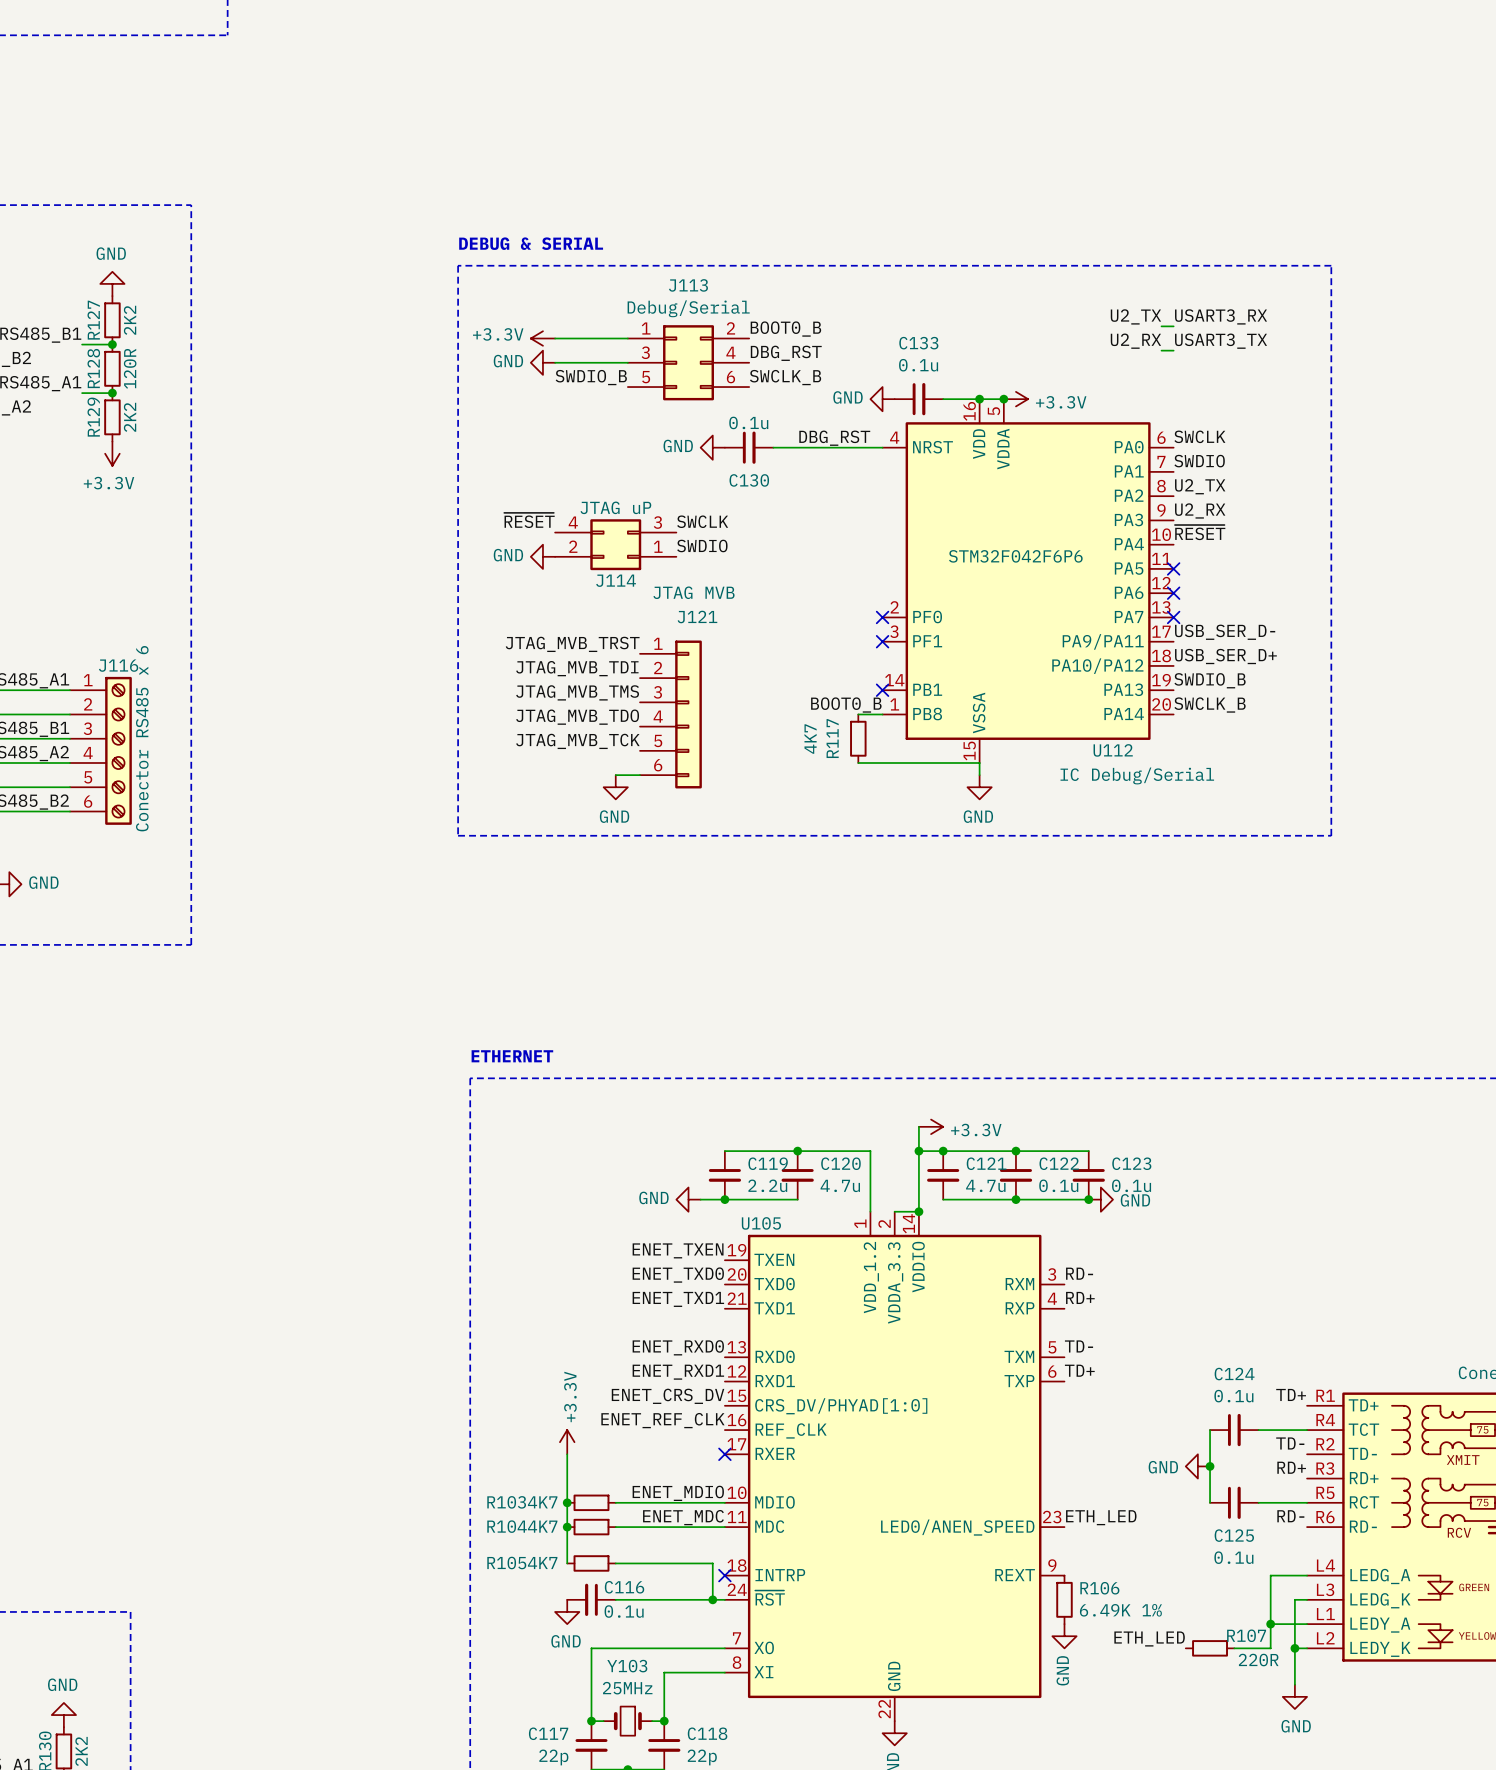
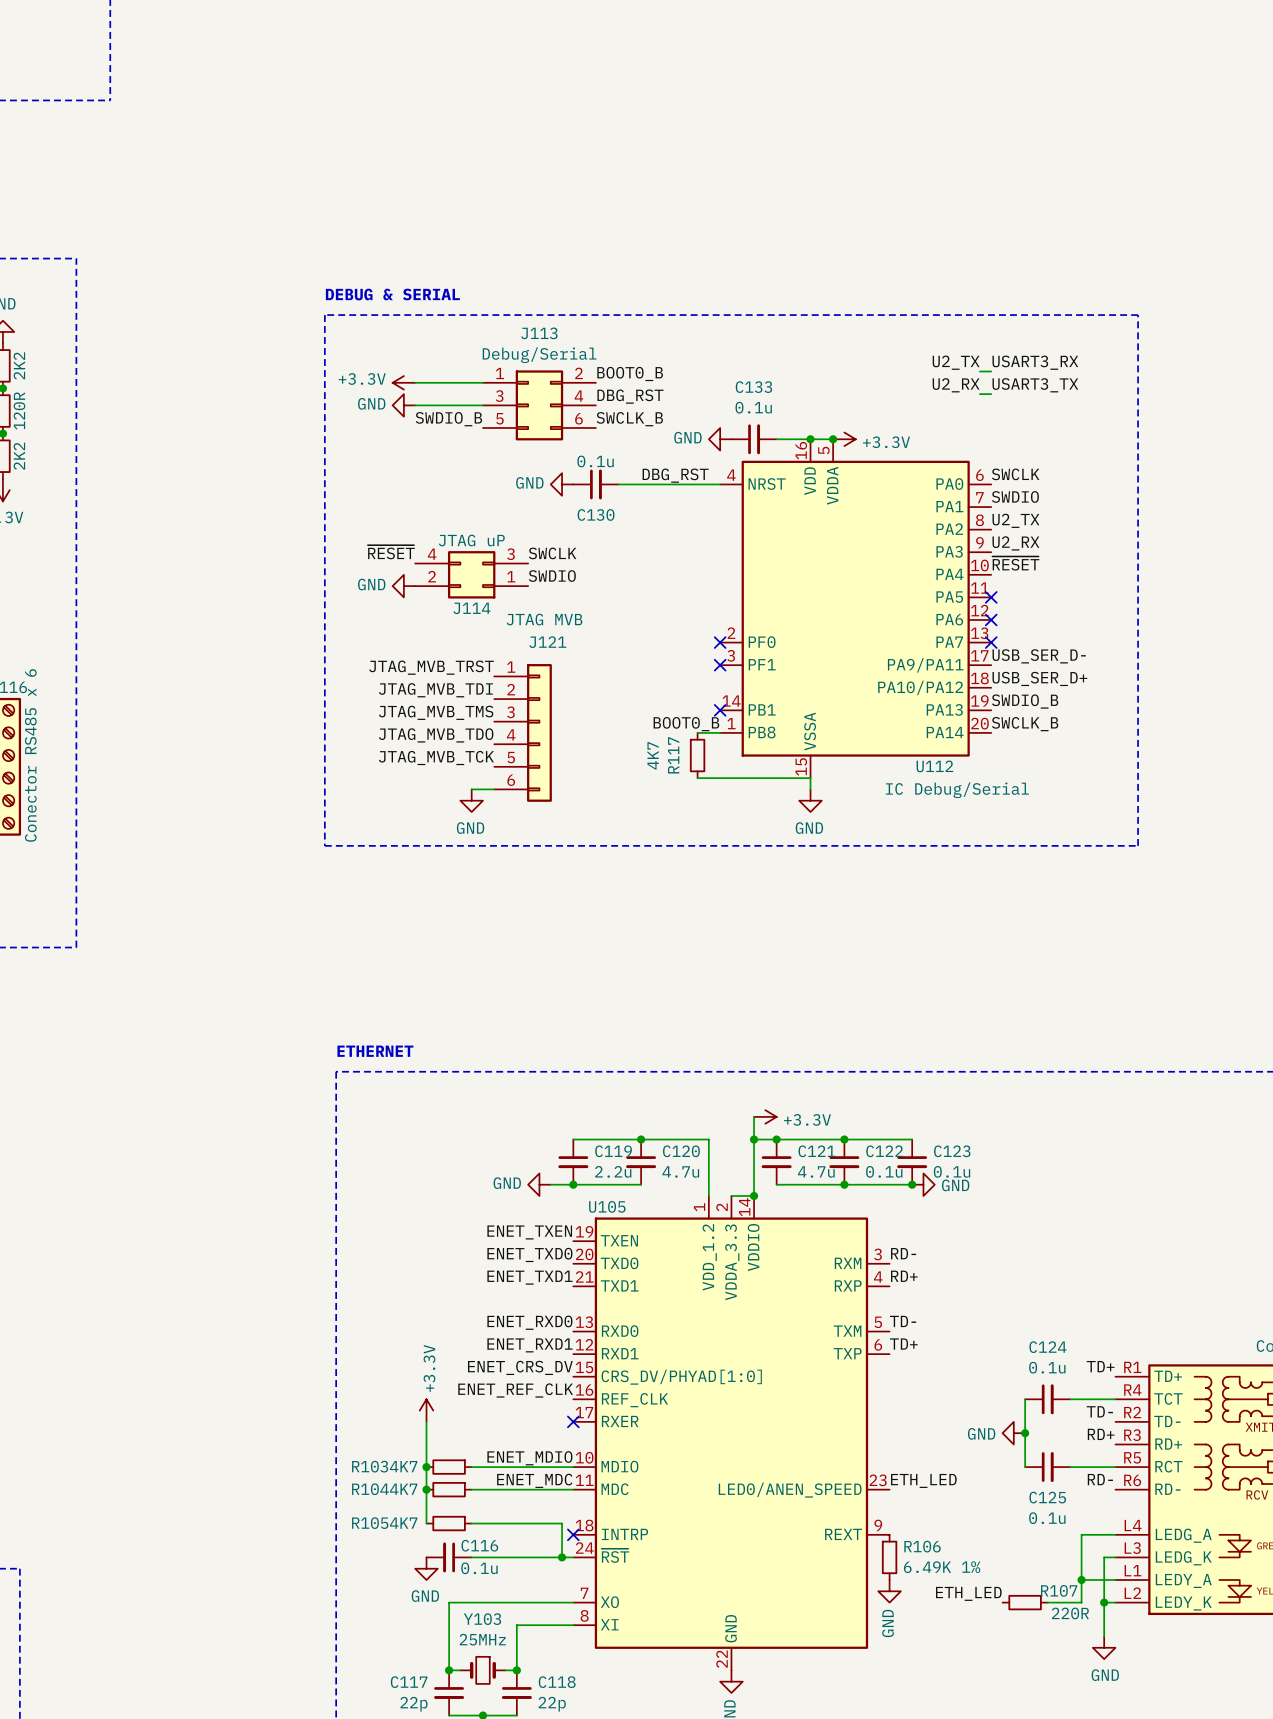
U112 text: STM32F042F6P6 (1015, 556) -> none

